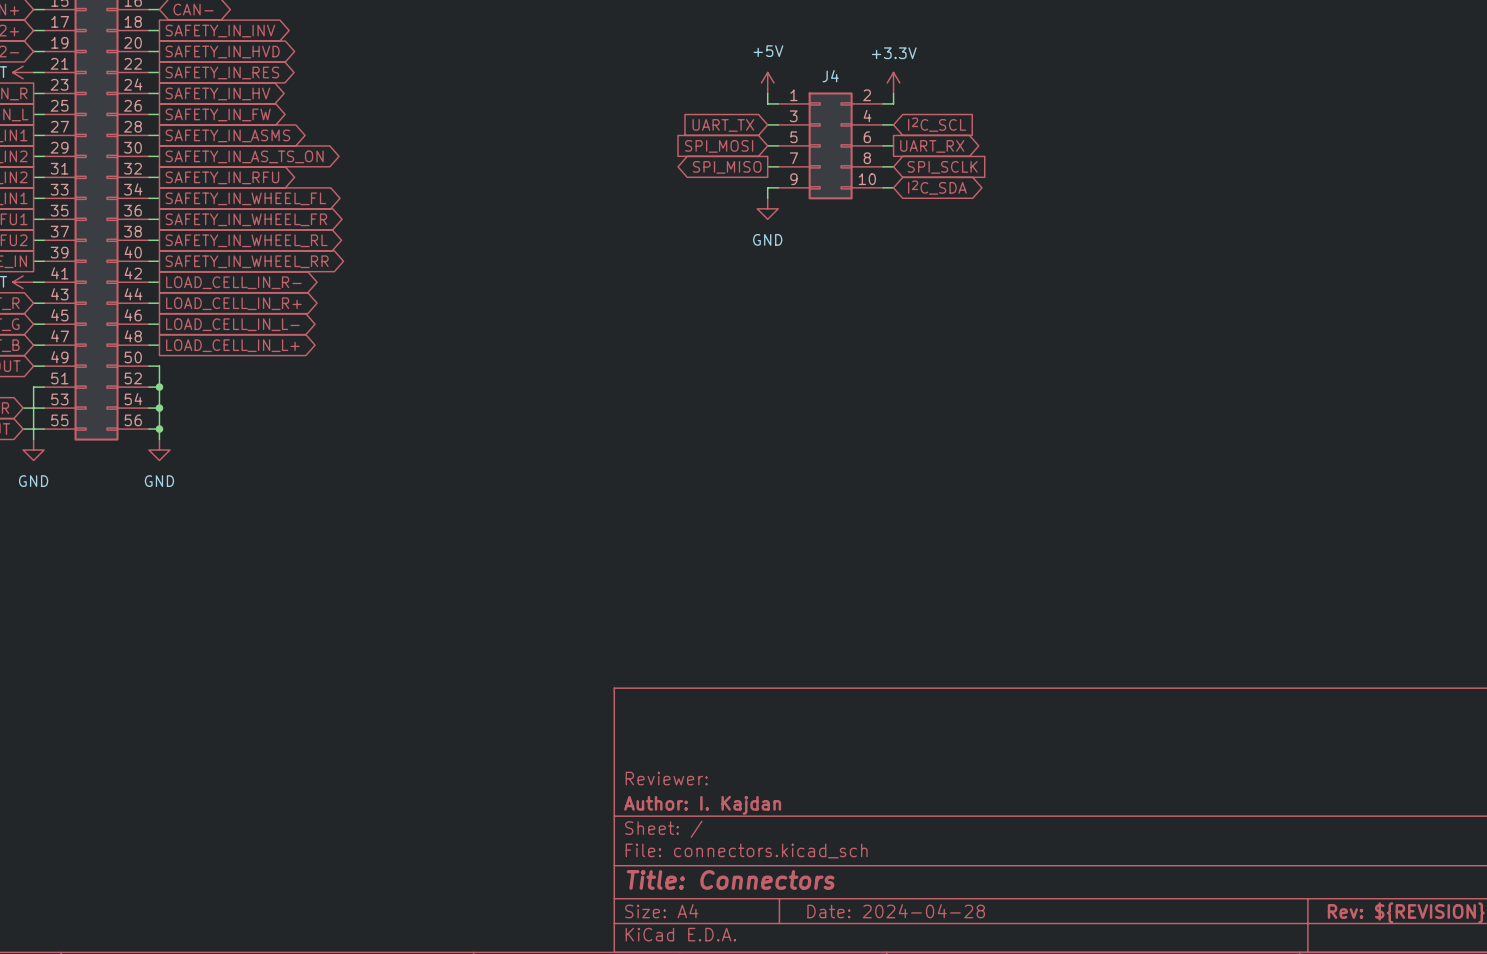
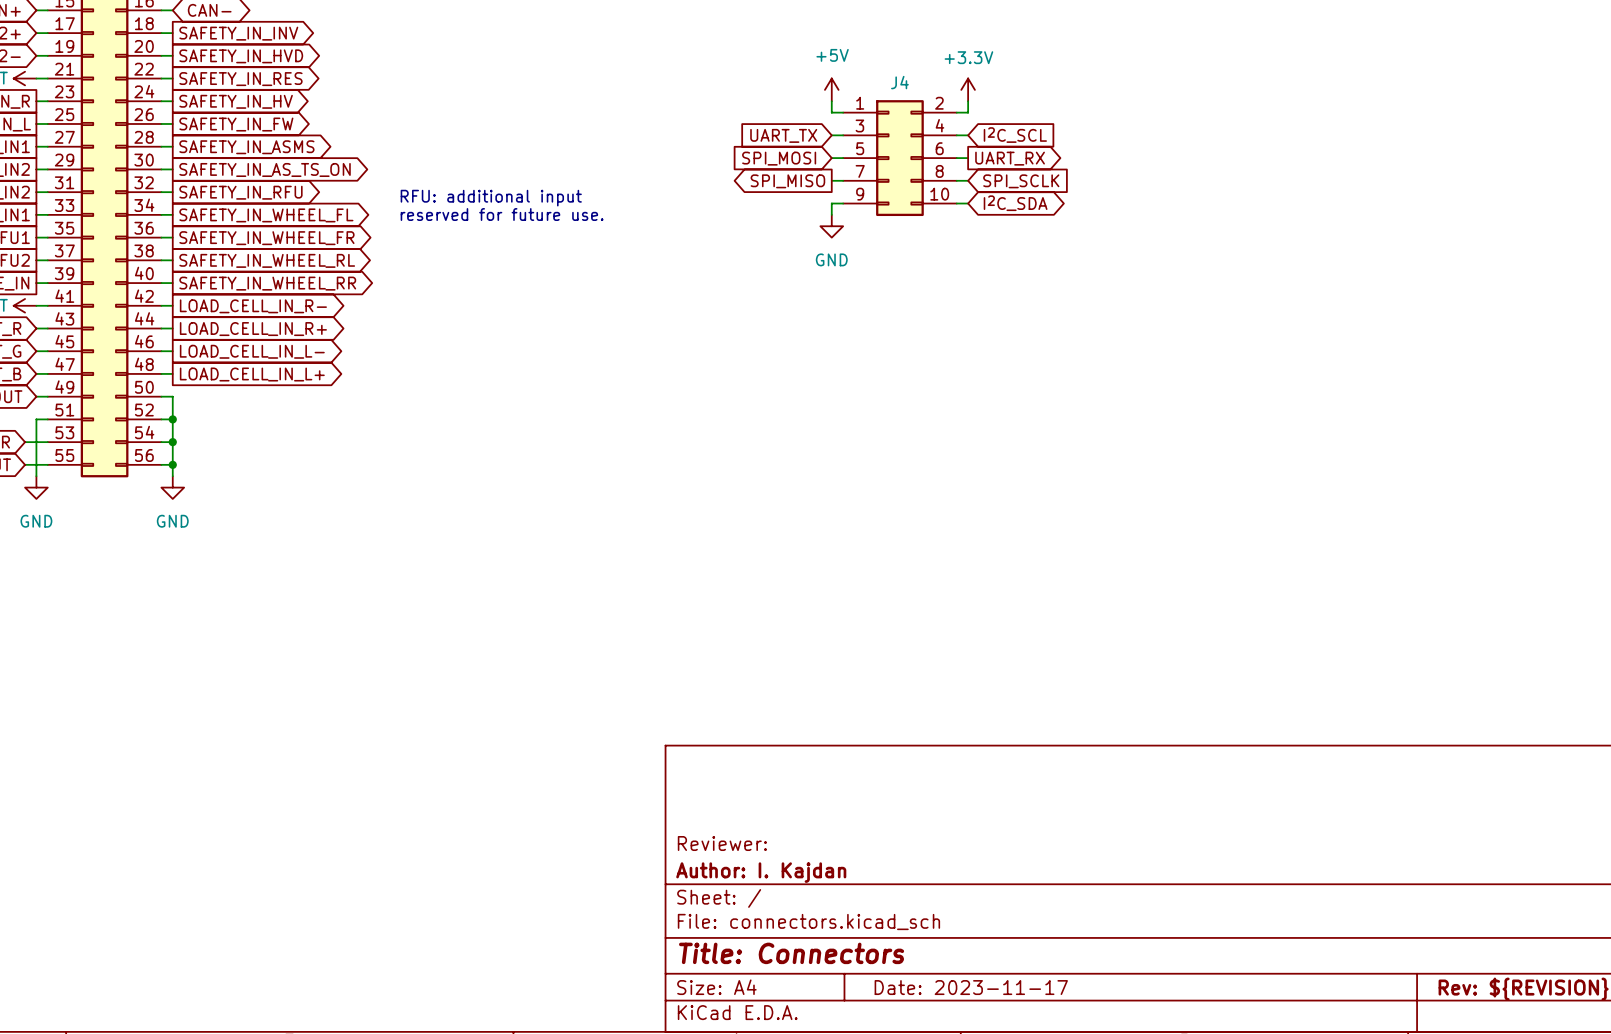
text: none -> RFU: additional input (491, 198)
text: none -> reserved for future use. (502, 214)
title block: Date: 2024-04-28 (896, 911) -> Date: 2023-11-17 (971, 987)

